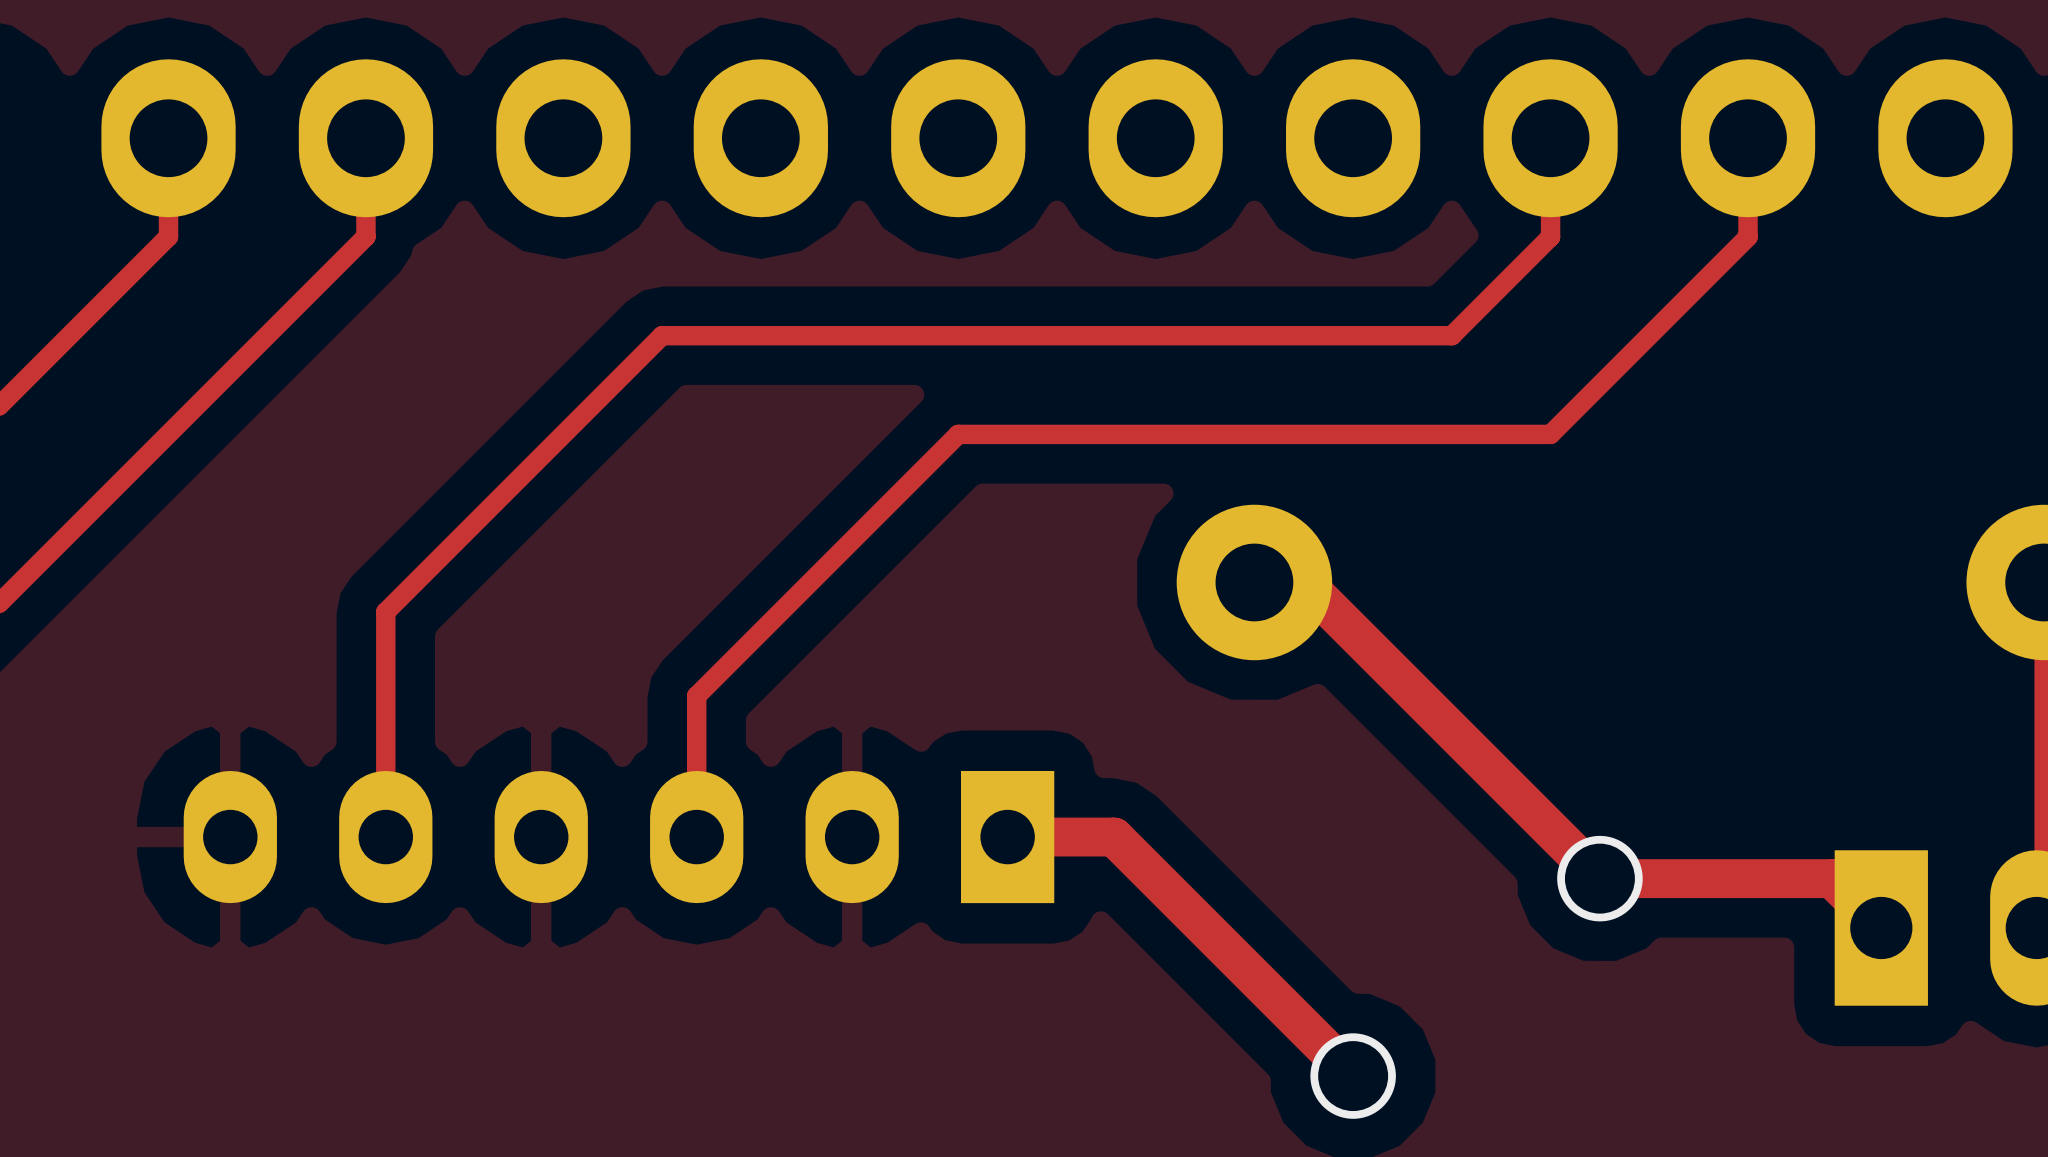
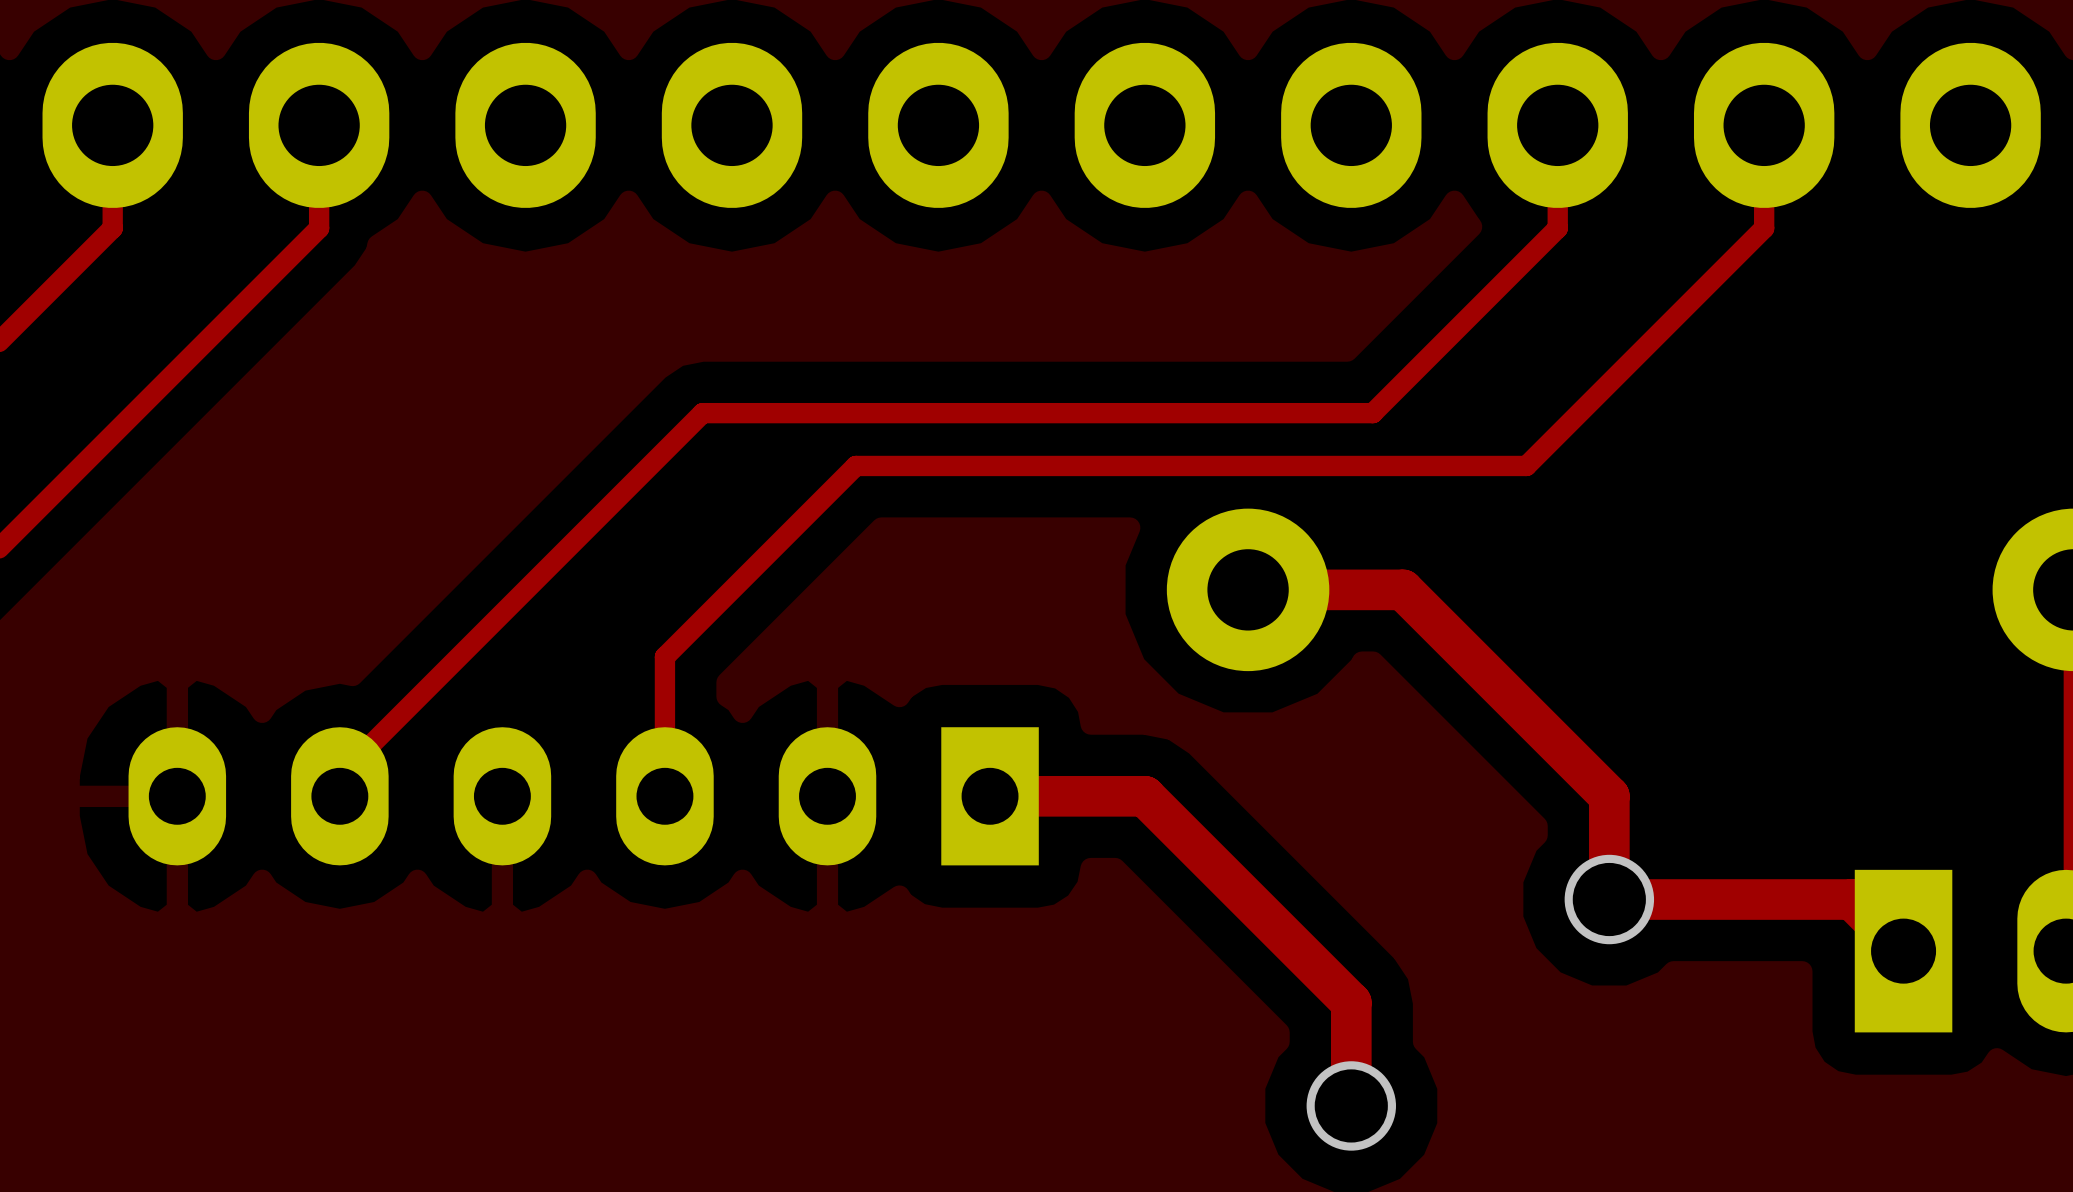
track: (1748, 236) (1550, 434) (958, 434) (696, 695) -> (1764, 228) (1526, 465) (855, 465) (664, 656) (664, 708)
track: (1451, 335) (662, 335) (385, 612) (385, 760) -> (1454, 331) (1372, 413) (702, 413) (339, 775)
track: (1303, 582) (1599, 878) -> (1299, 589) (1402, 589) (1609, 796) (1609, 899)
part position: (618, 837) -> (583, 796)
track: (1007, 837) (1114, 837) (1353, 1076) -> (990, 796) (1144, 796) (1351, 1002) (1351, 1105)

